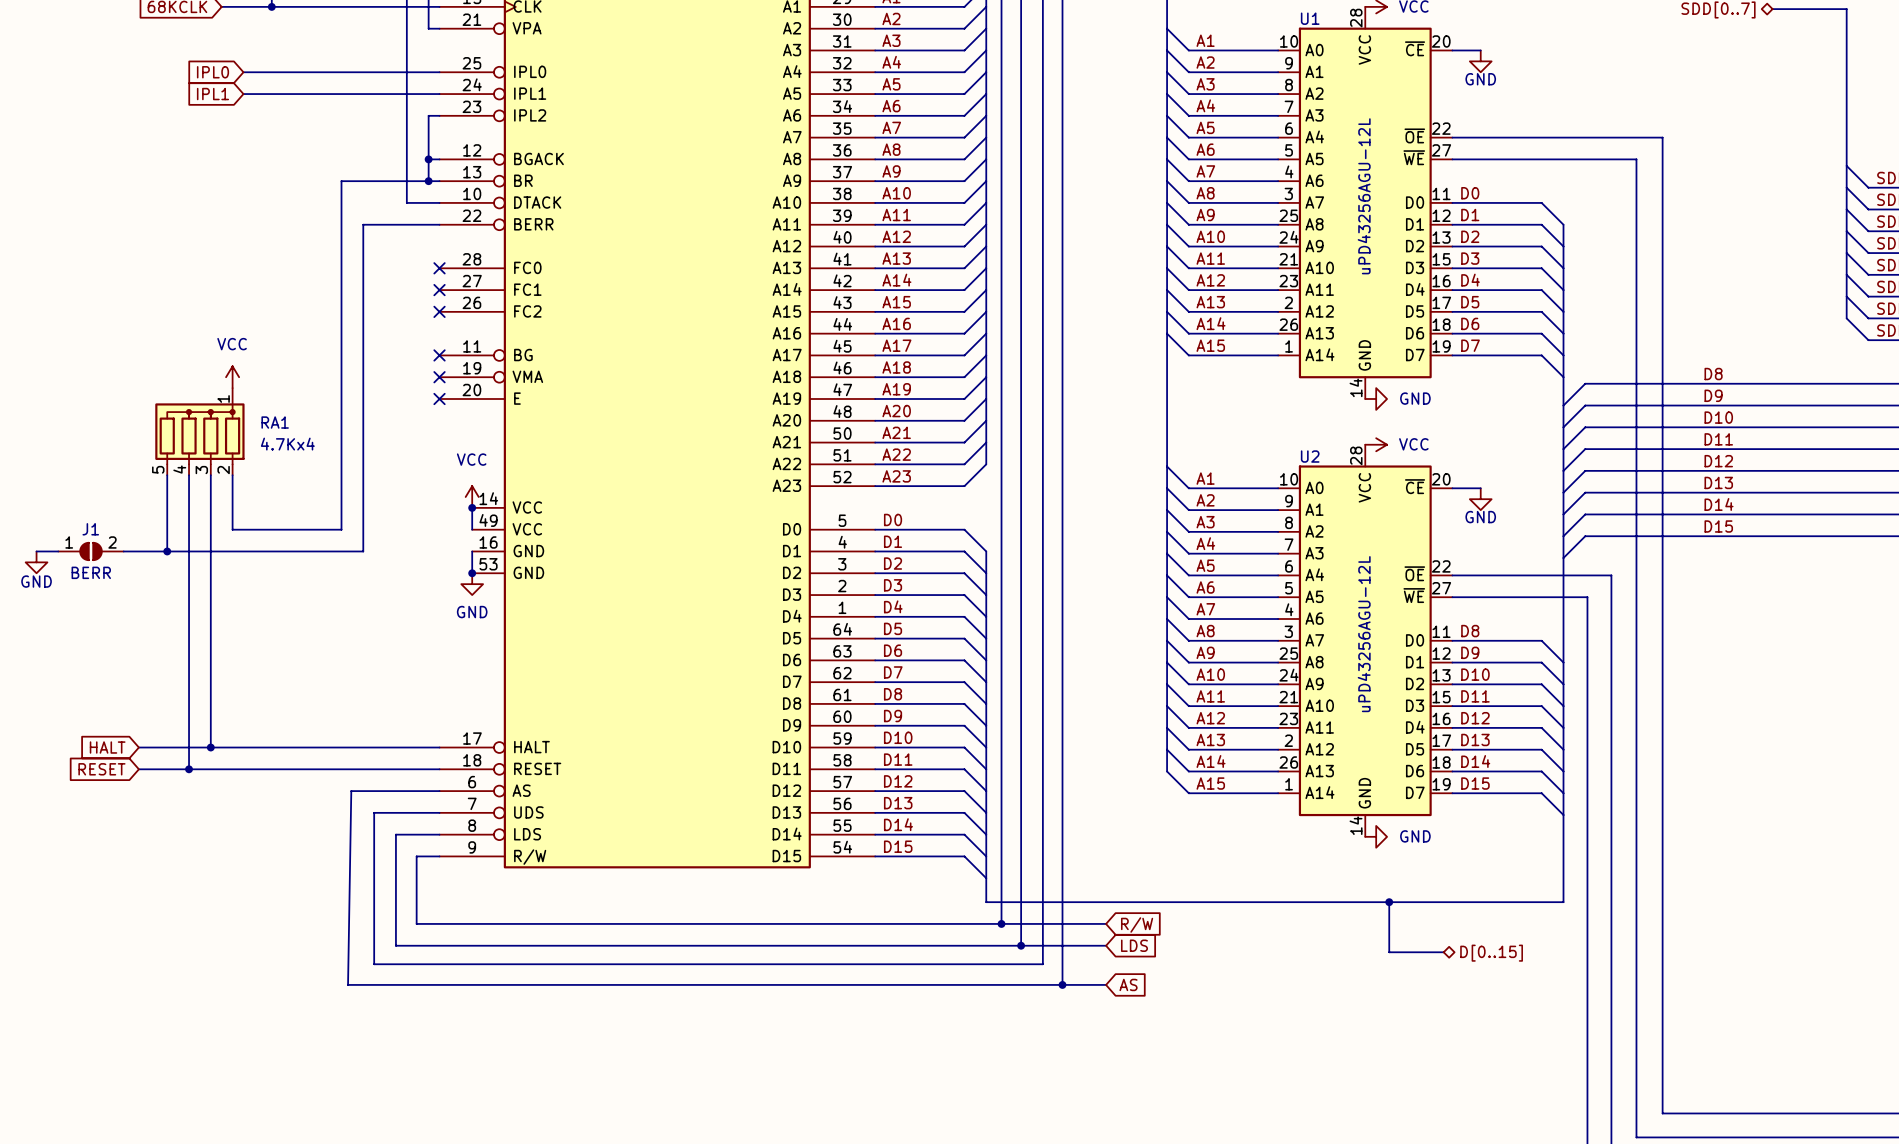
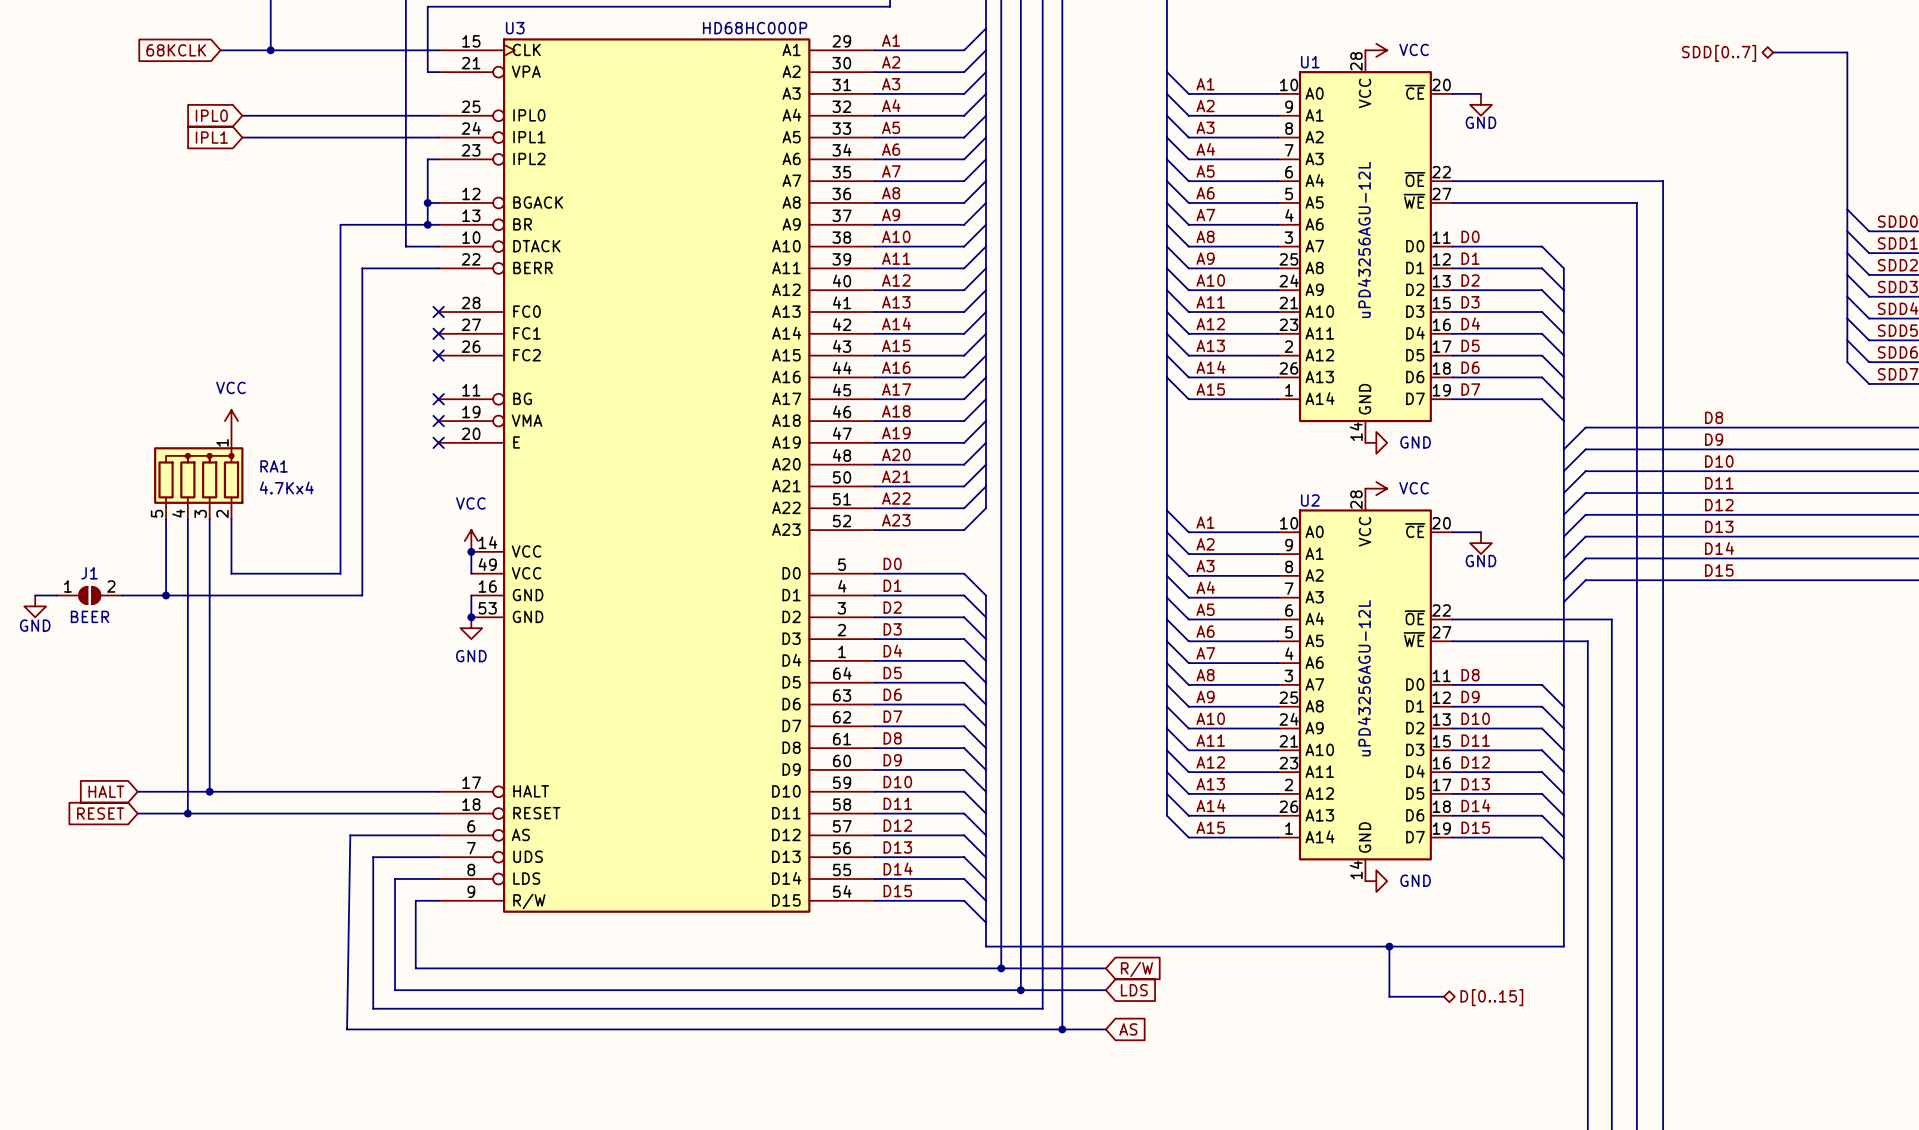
J1 value: BERR (91, 572) -> BEER (89, 616)

